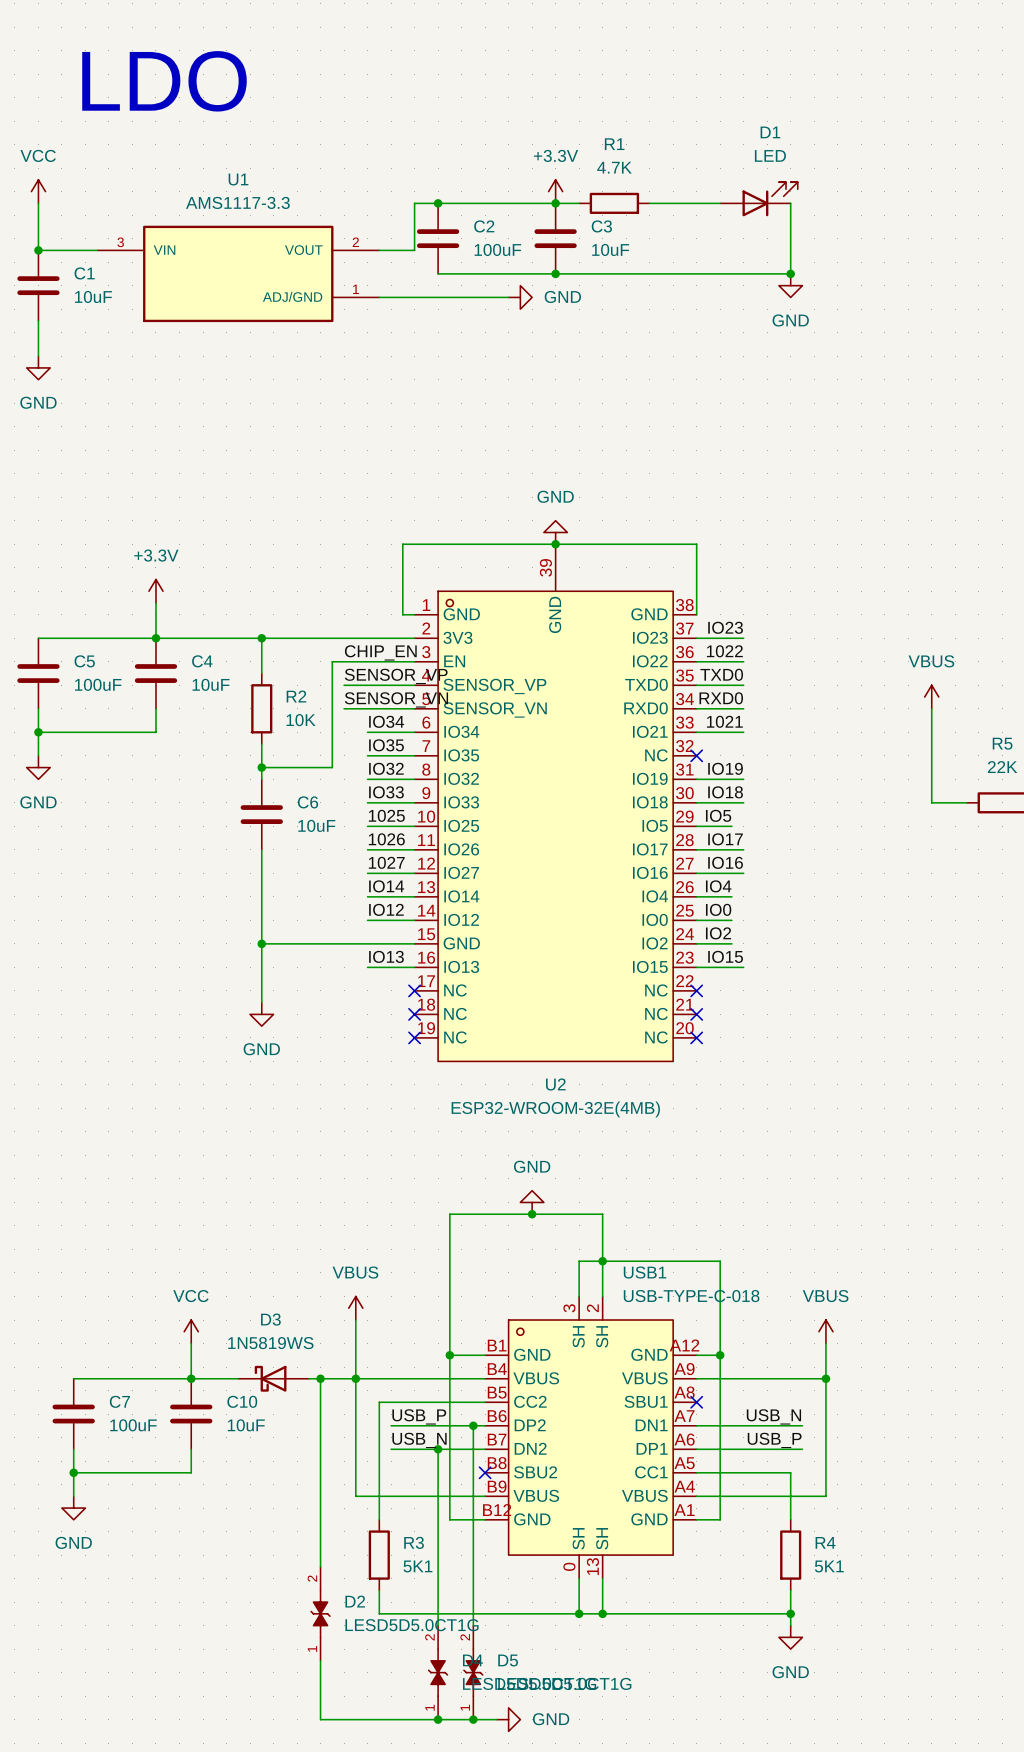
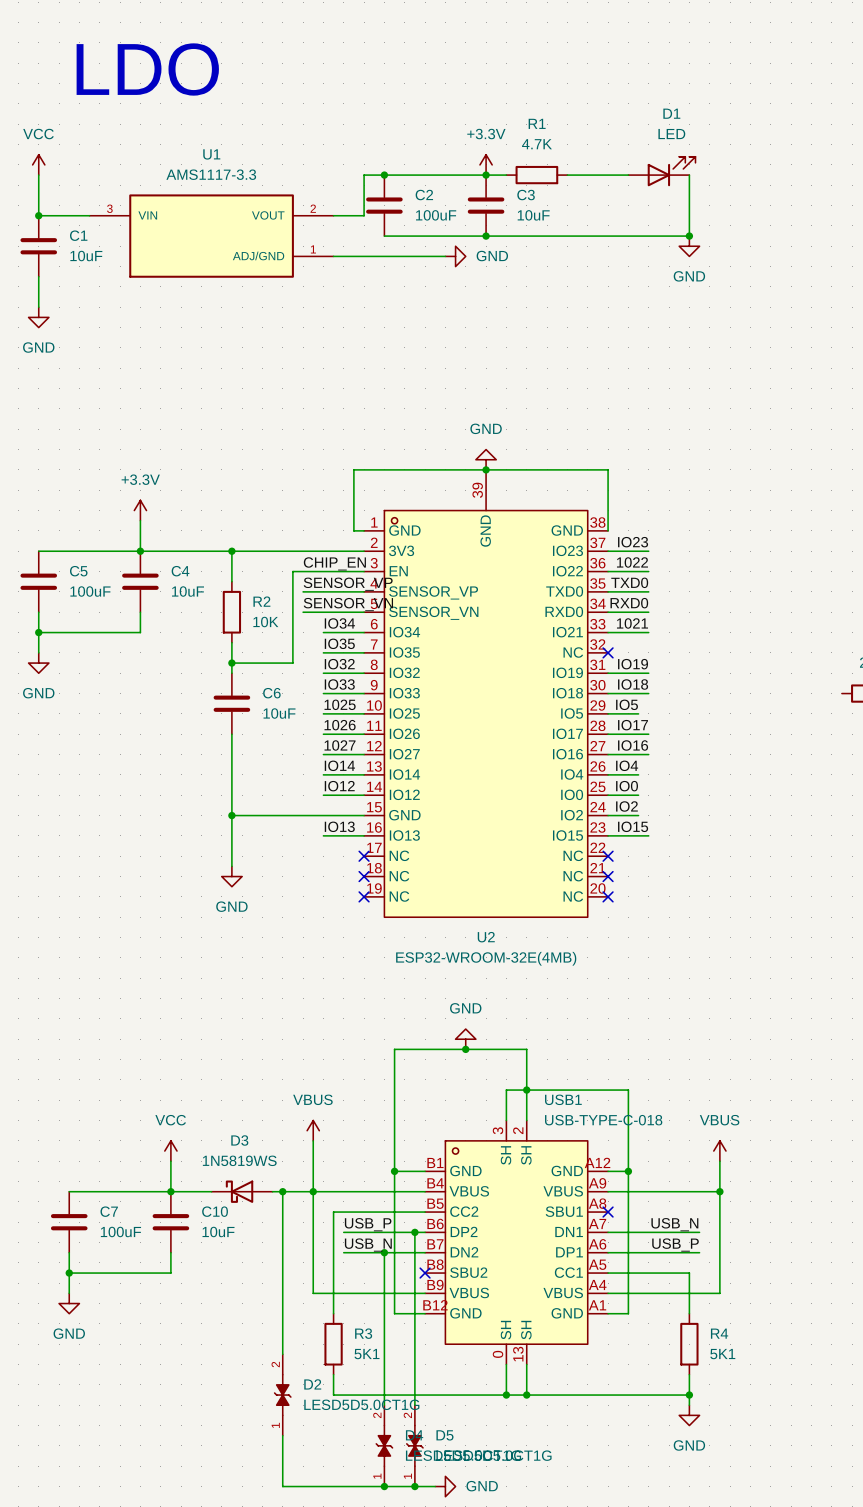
power symbol: VBUS (931, 697) -> none
wire: (931, 708) (931, 802) (967, 802) -> none

